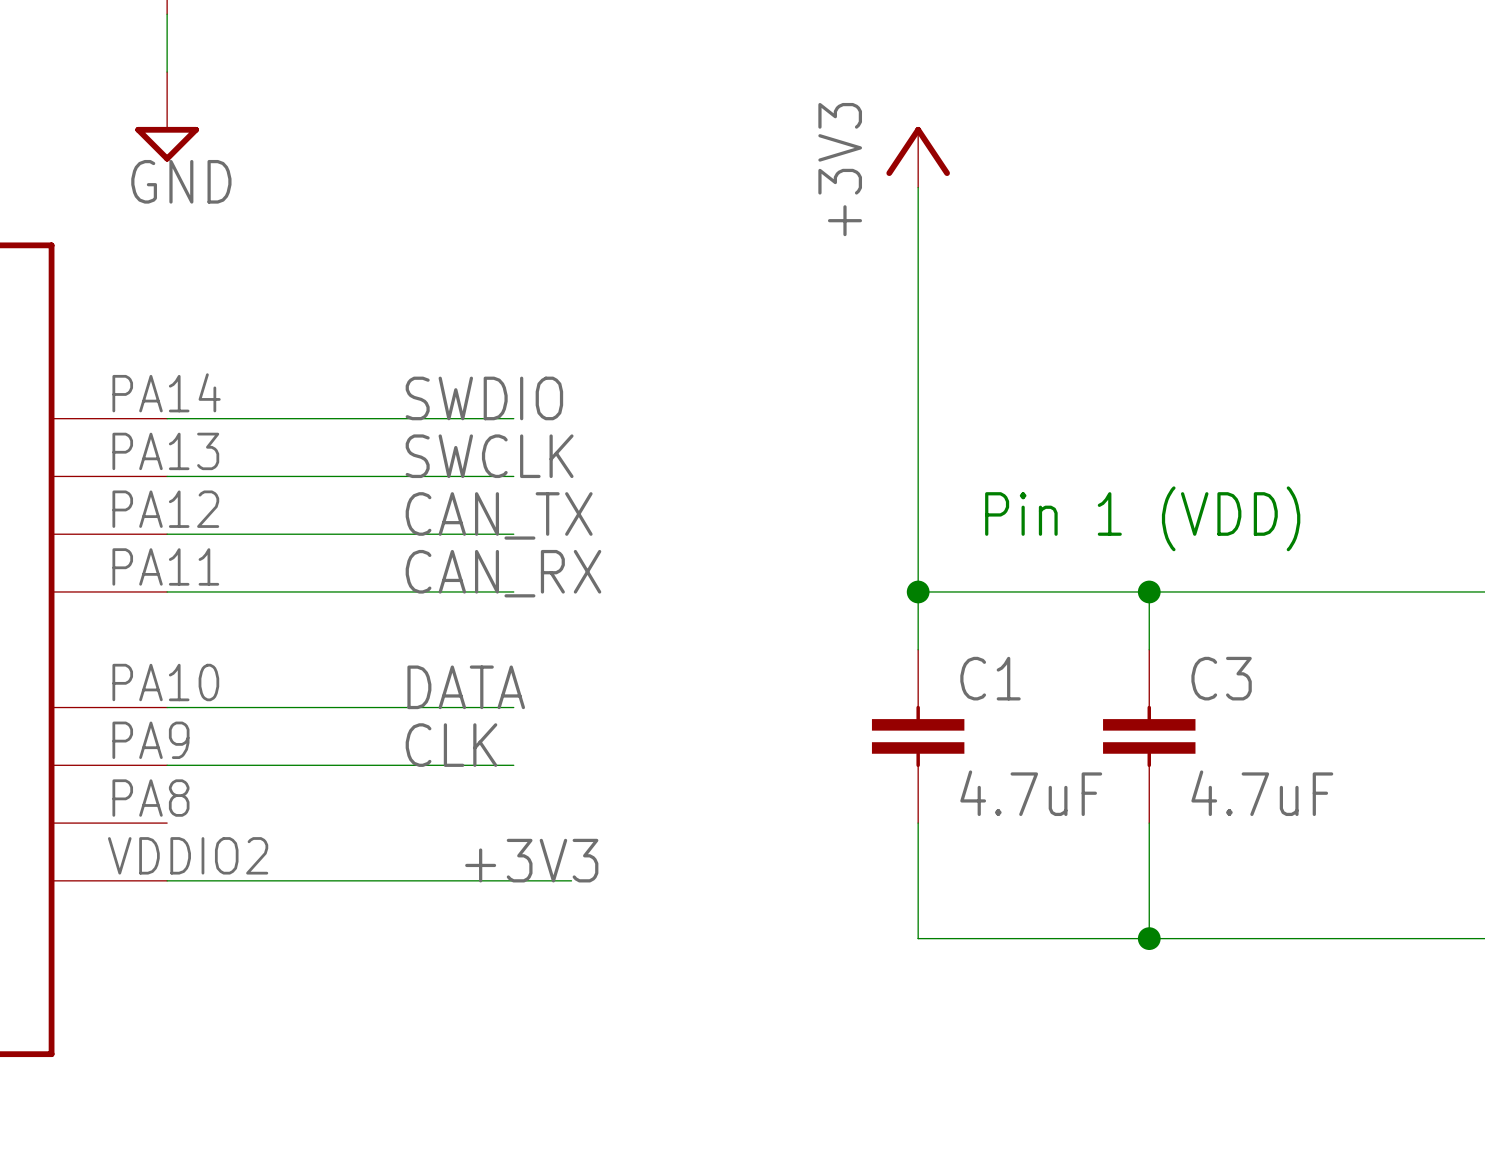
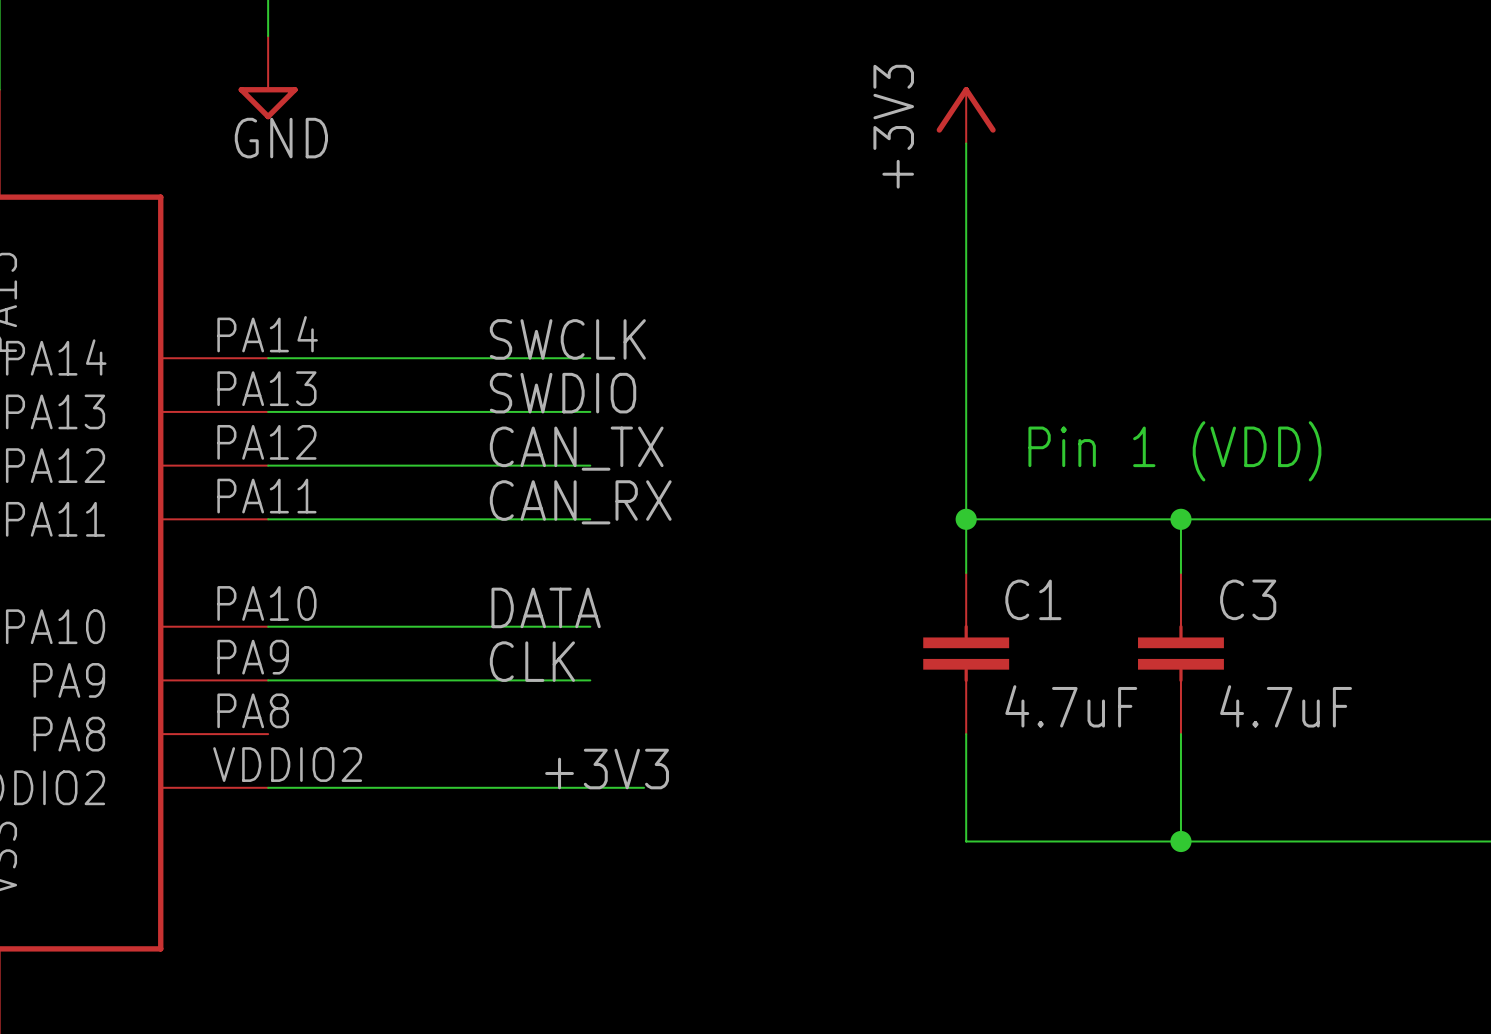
label: SWDIO (484, 398) -> SWCLK (567, 339)
label: SWCLK (489, 456) -> SWDIO (563, 393)

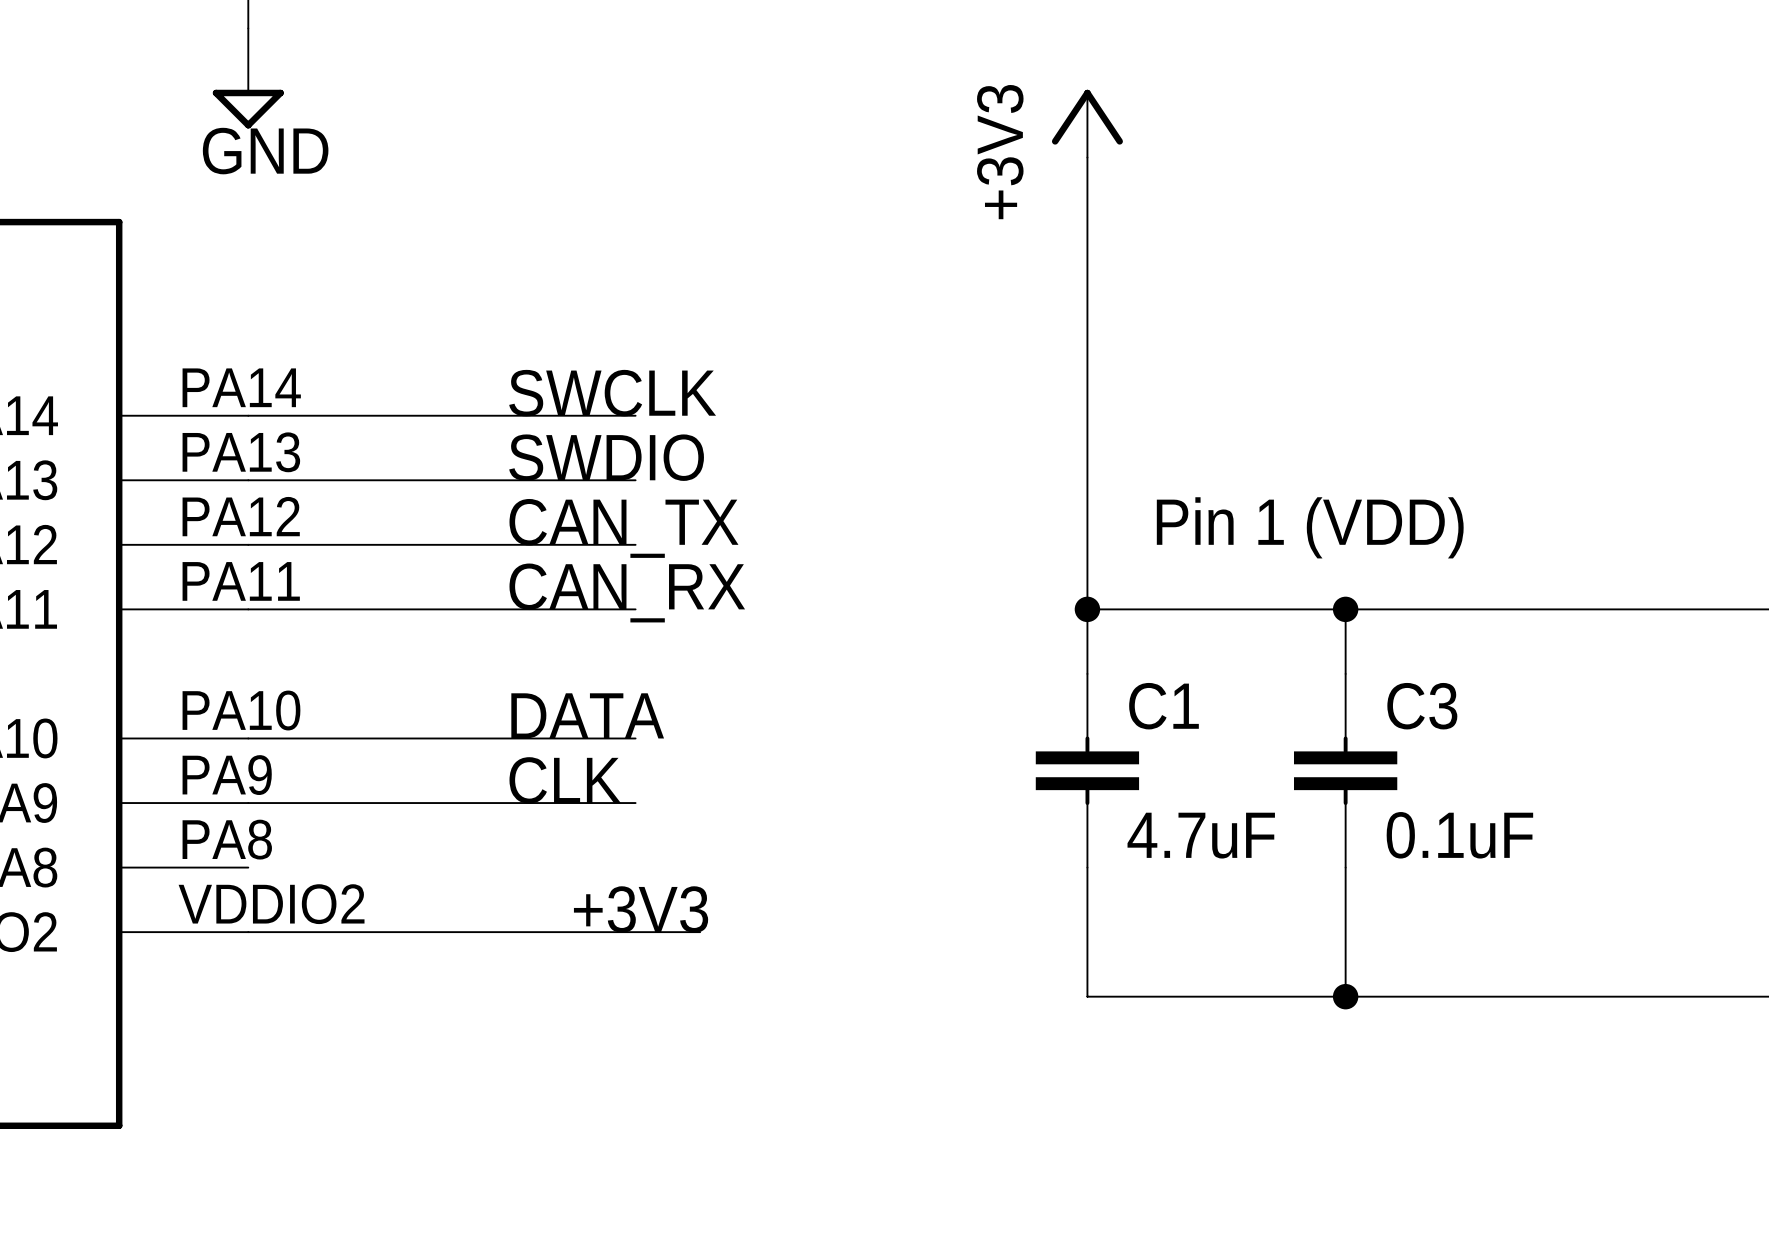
C3 value: 4.7uF (1286, 706) -> 0.1uF (1459, 835)

